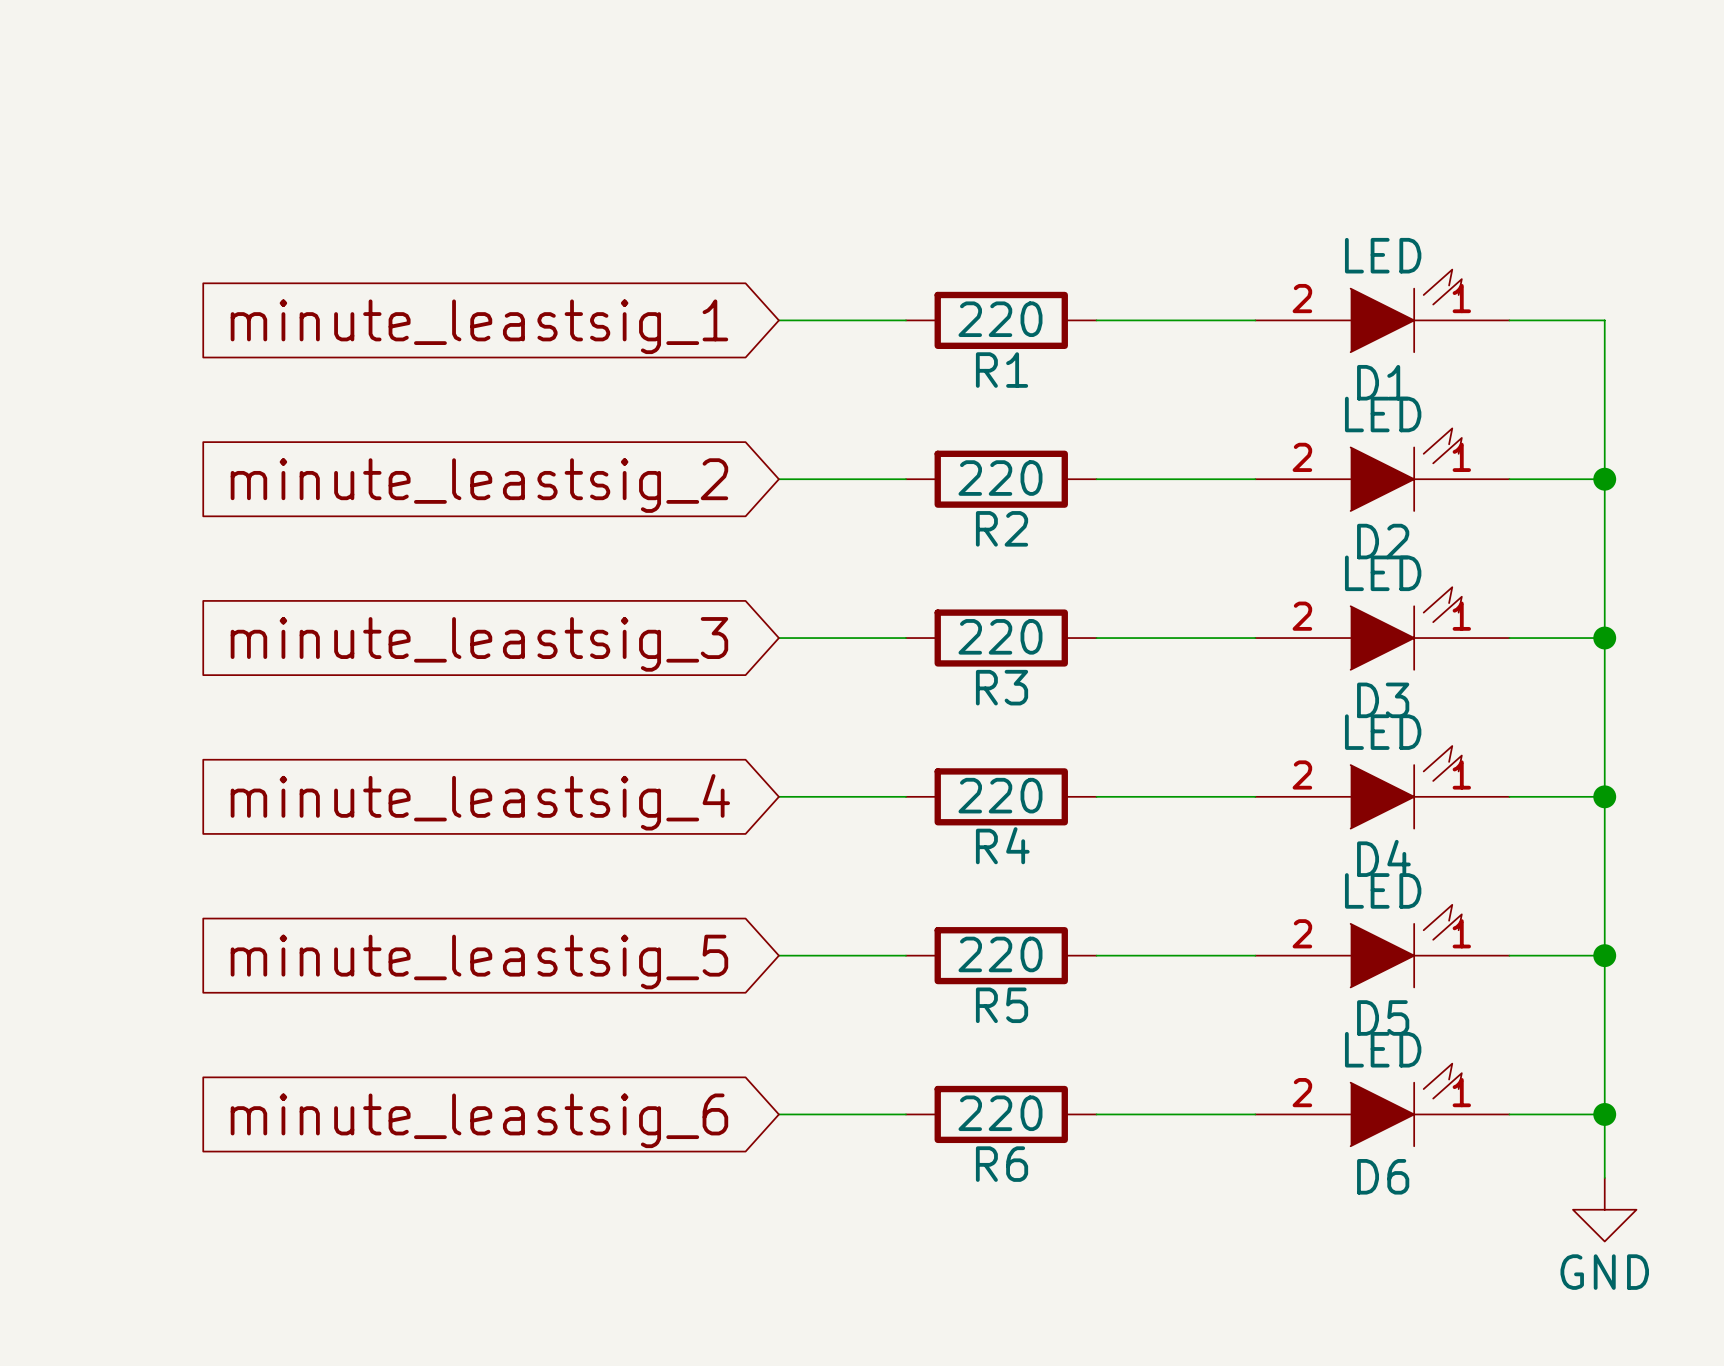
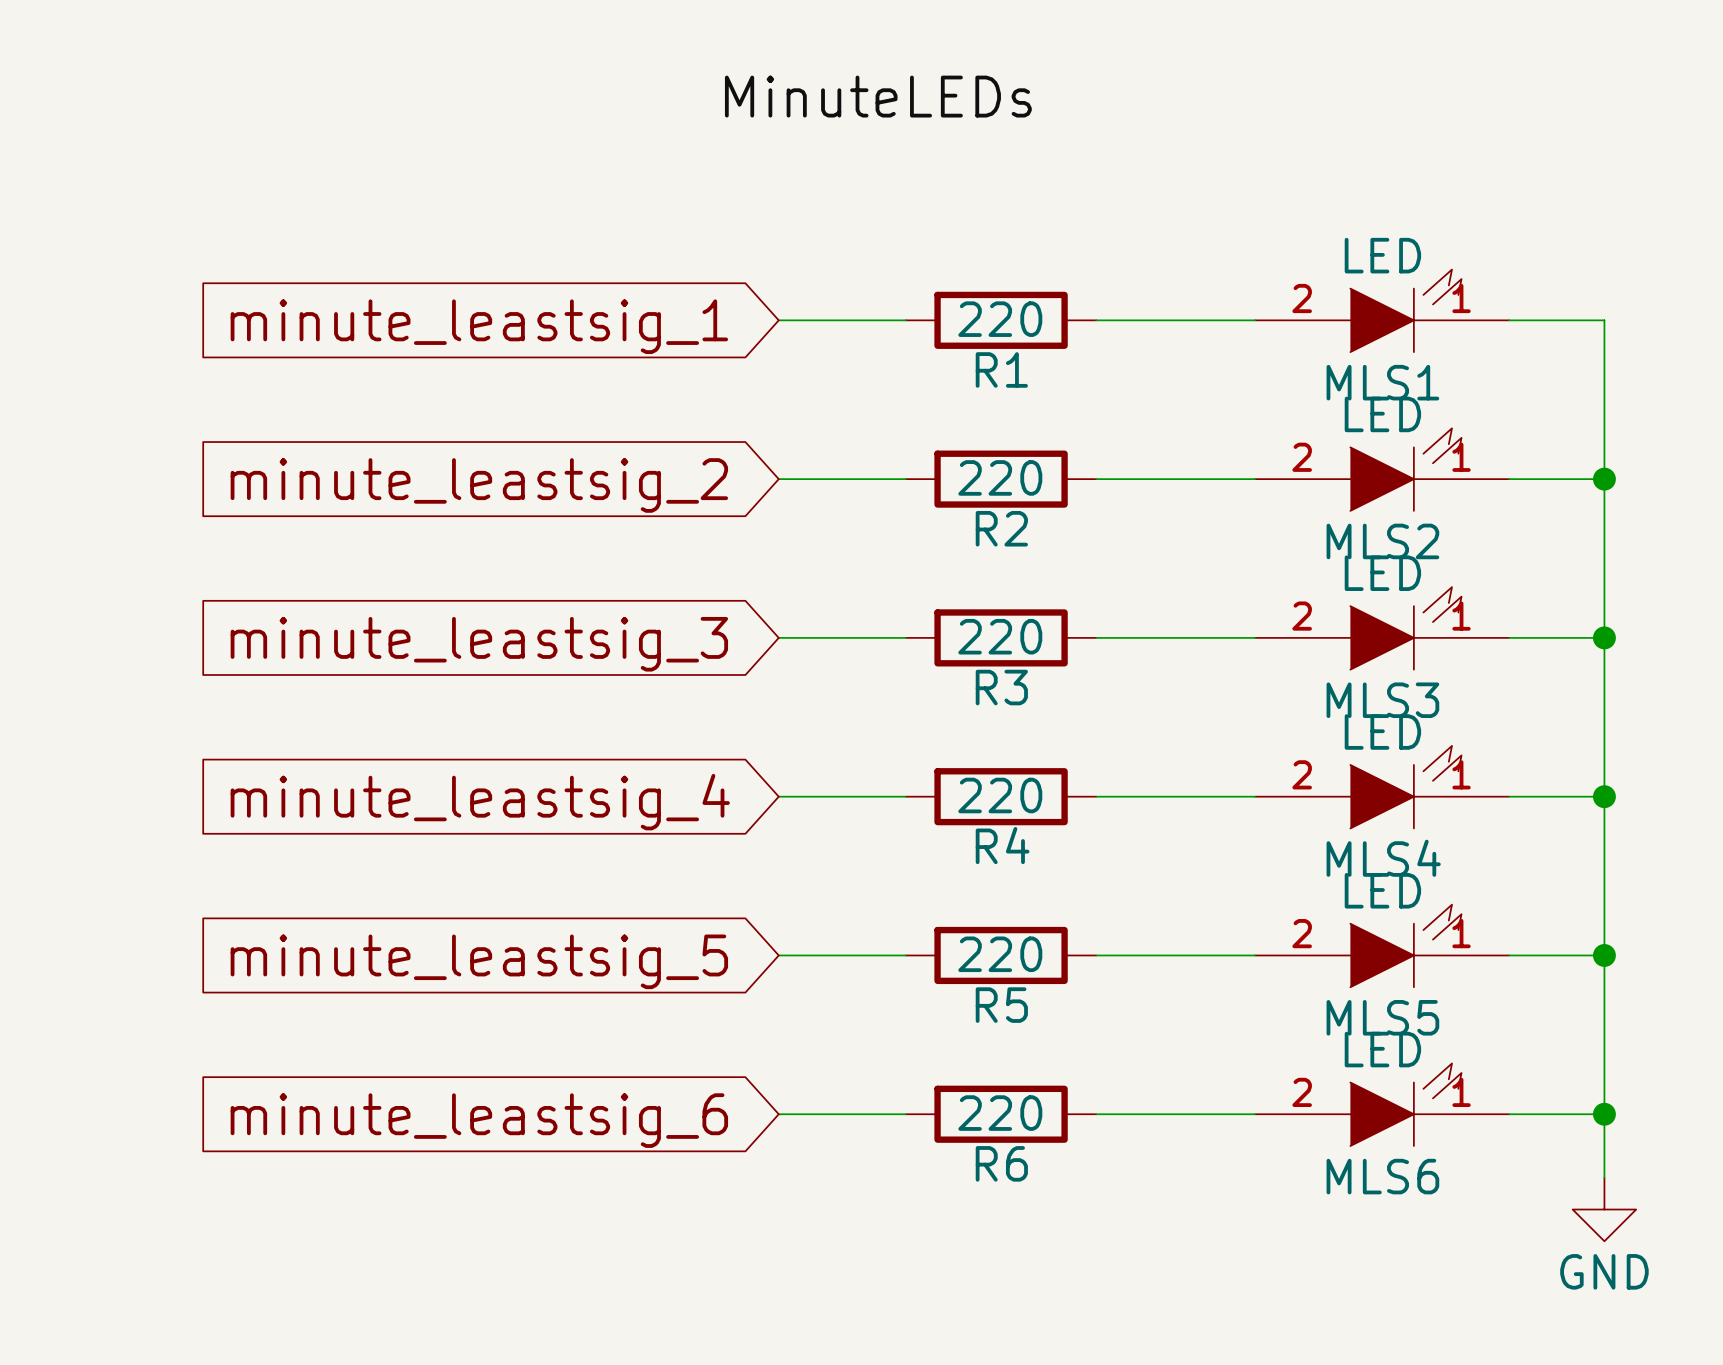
label: none -> MinuteLEDs (878, 96)
D1 name: D1 (1383, 382) -> MLS1 (1382, 382)
D2 name: D2 (1383, 541) -> MLS2 (1382, 541)
D3 name: D3 (1383, 700) -> MLS3 (1382, 700)
D4 name: D4 (1383, 858) -> MLS4 (1383, 858)
D5 name: D5 (1383, 1017) -> MLS5 (1382, 1017)
D6 name: D6 (1383, 1176) -> MLS6 (1382, 1176)

